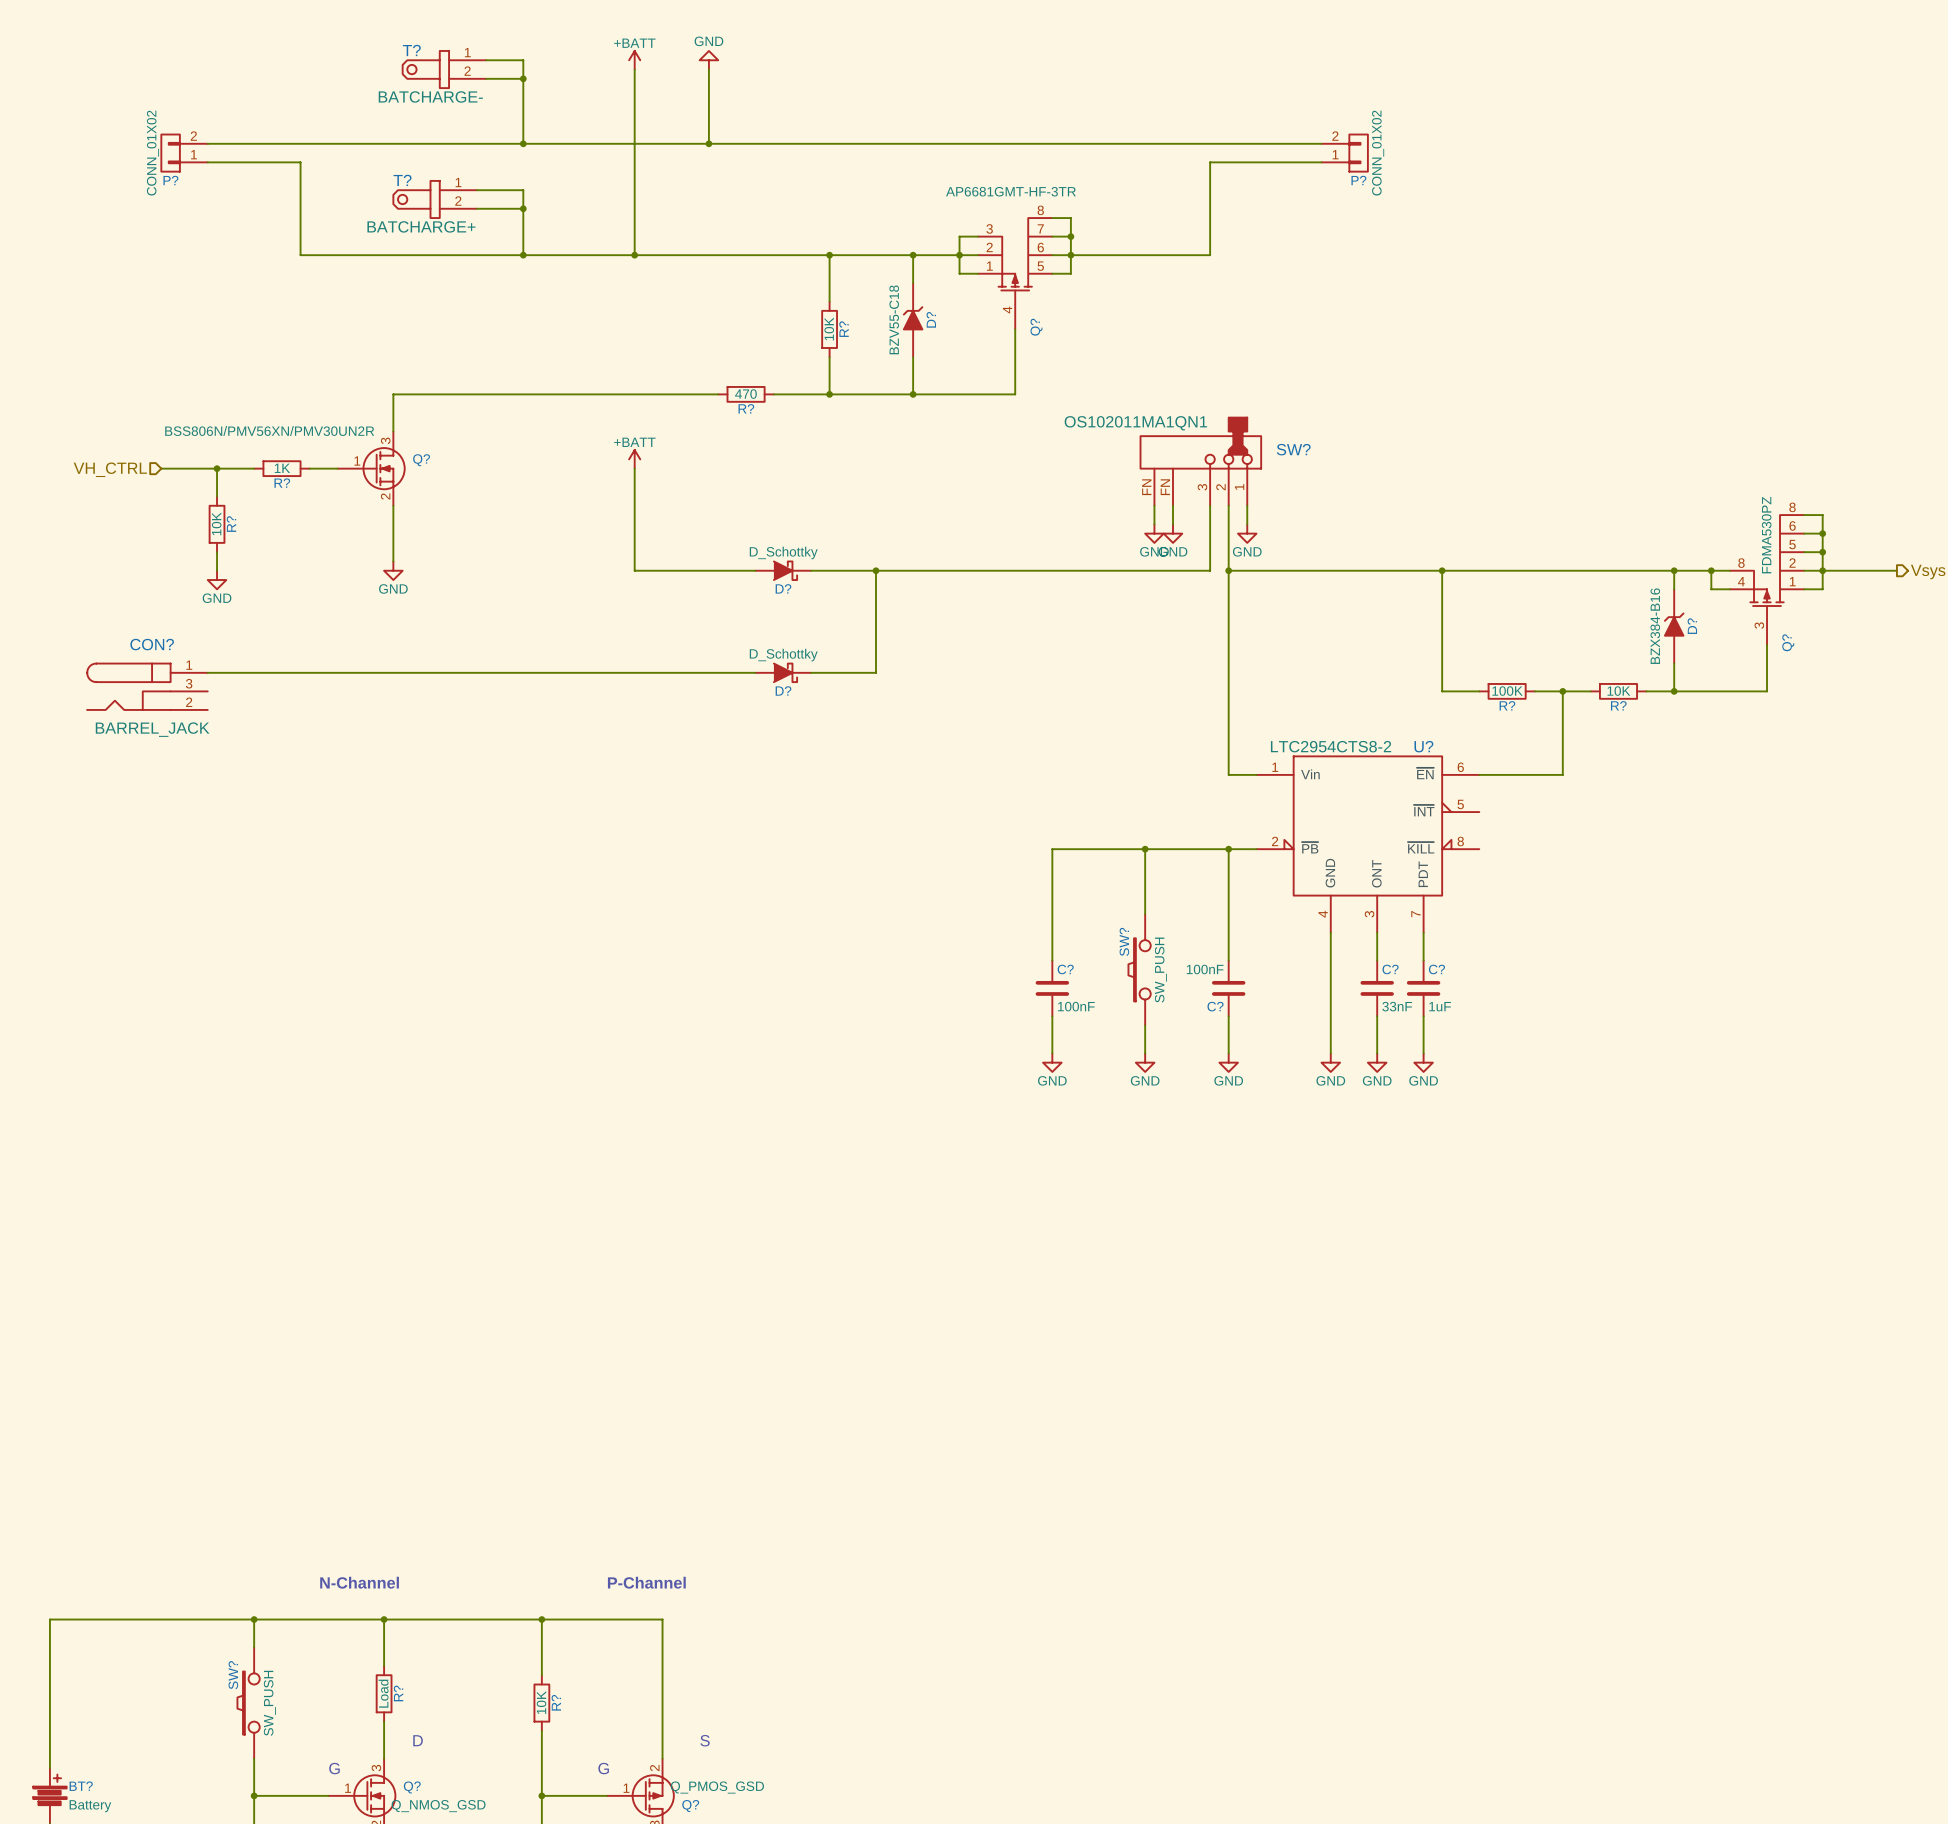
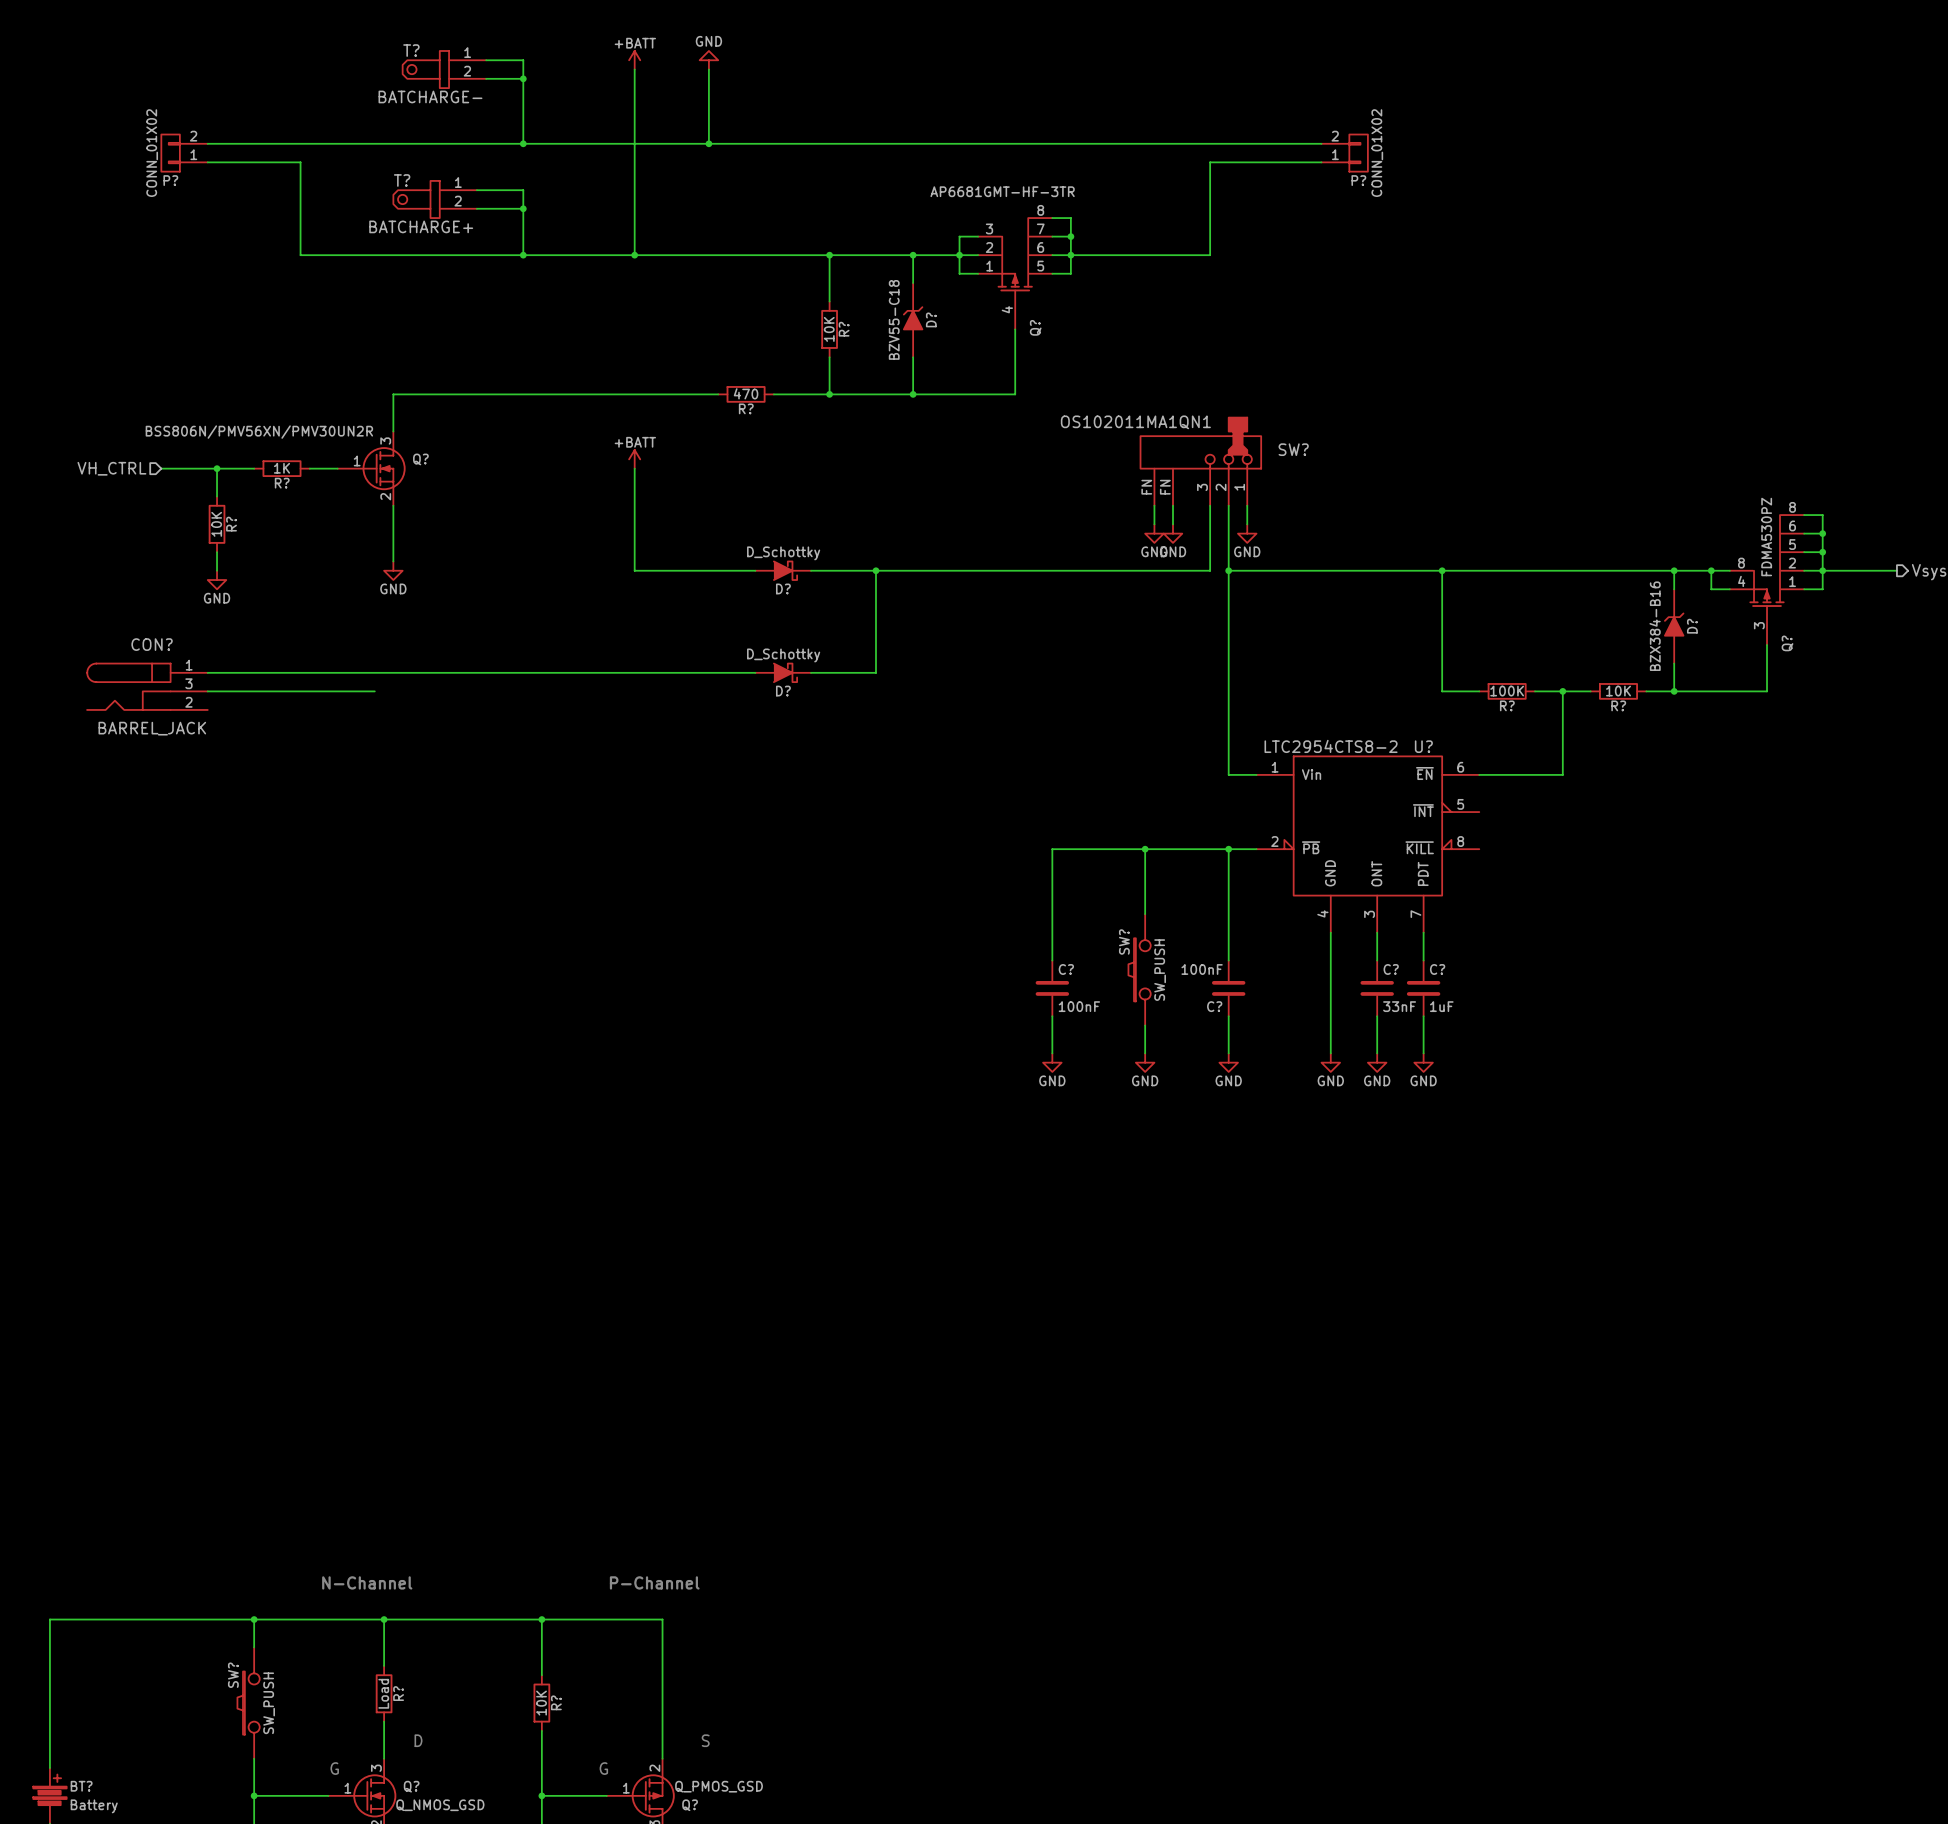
wire: none -> (207, 691) (374, 691)

